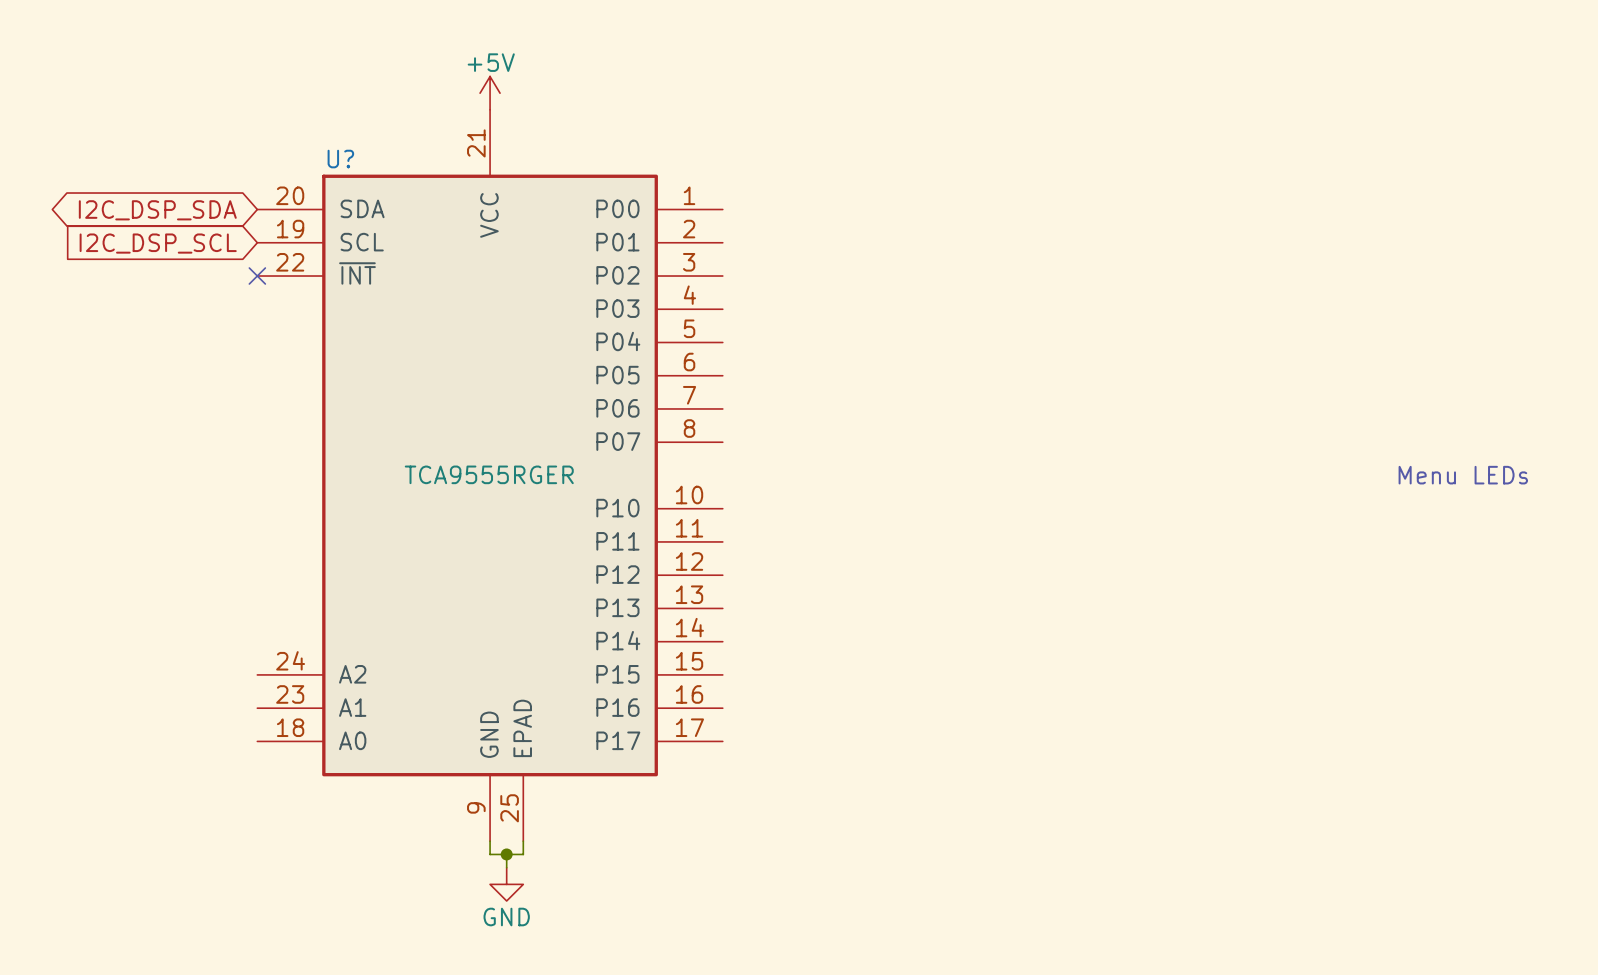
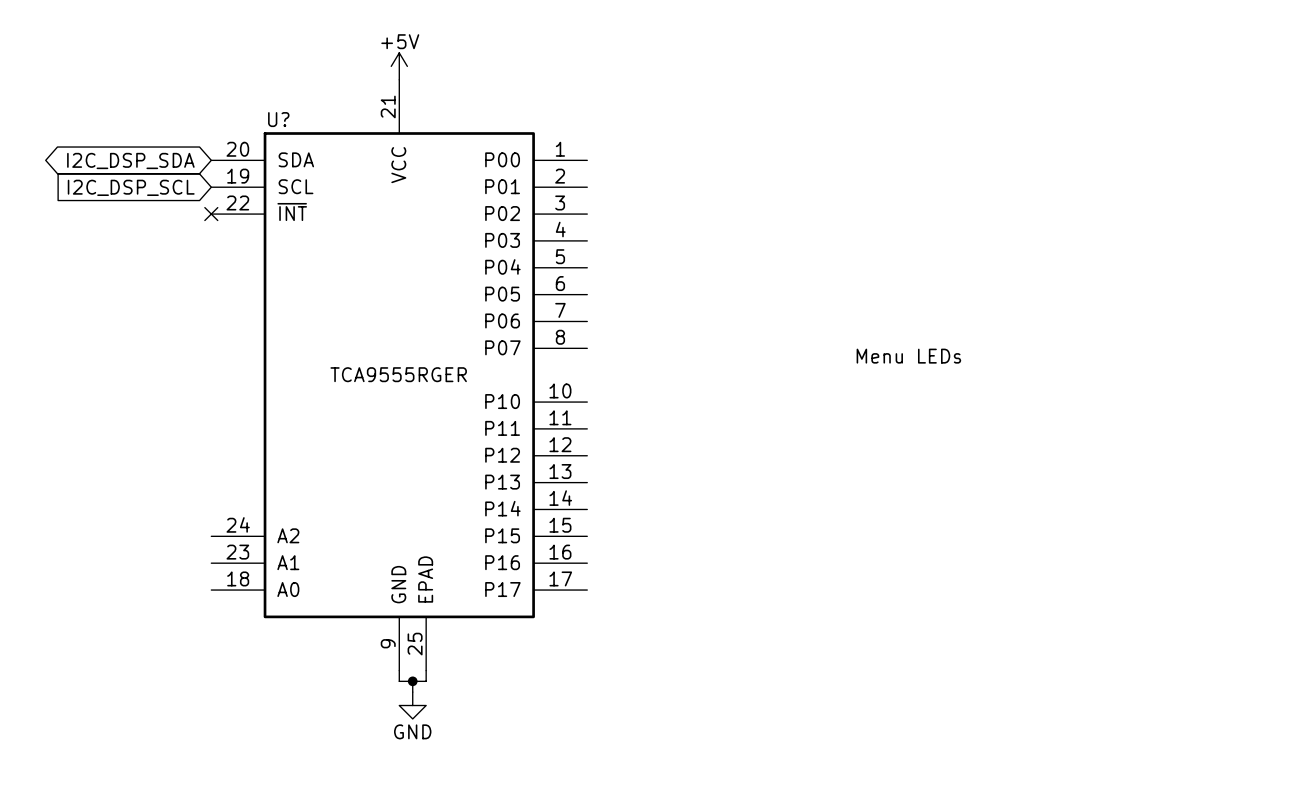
text: none -> Menu LEDs (908, 356)
text: Menu LEDs (1463, 475) -> none

